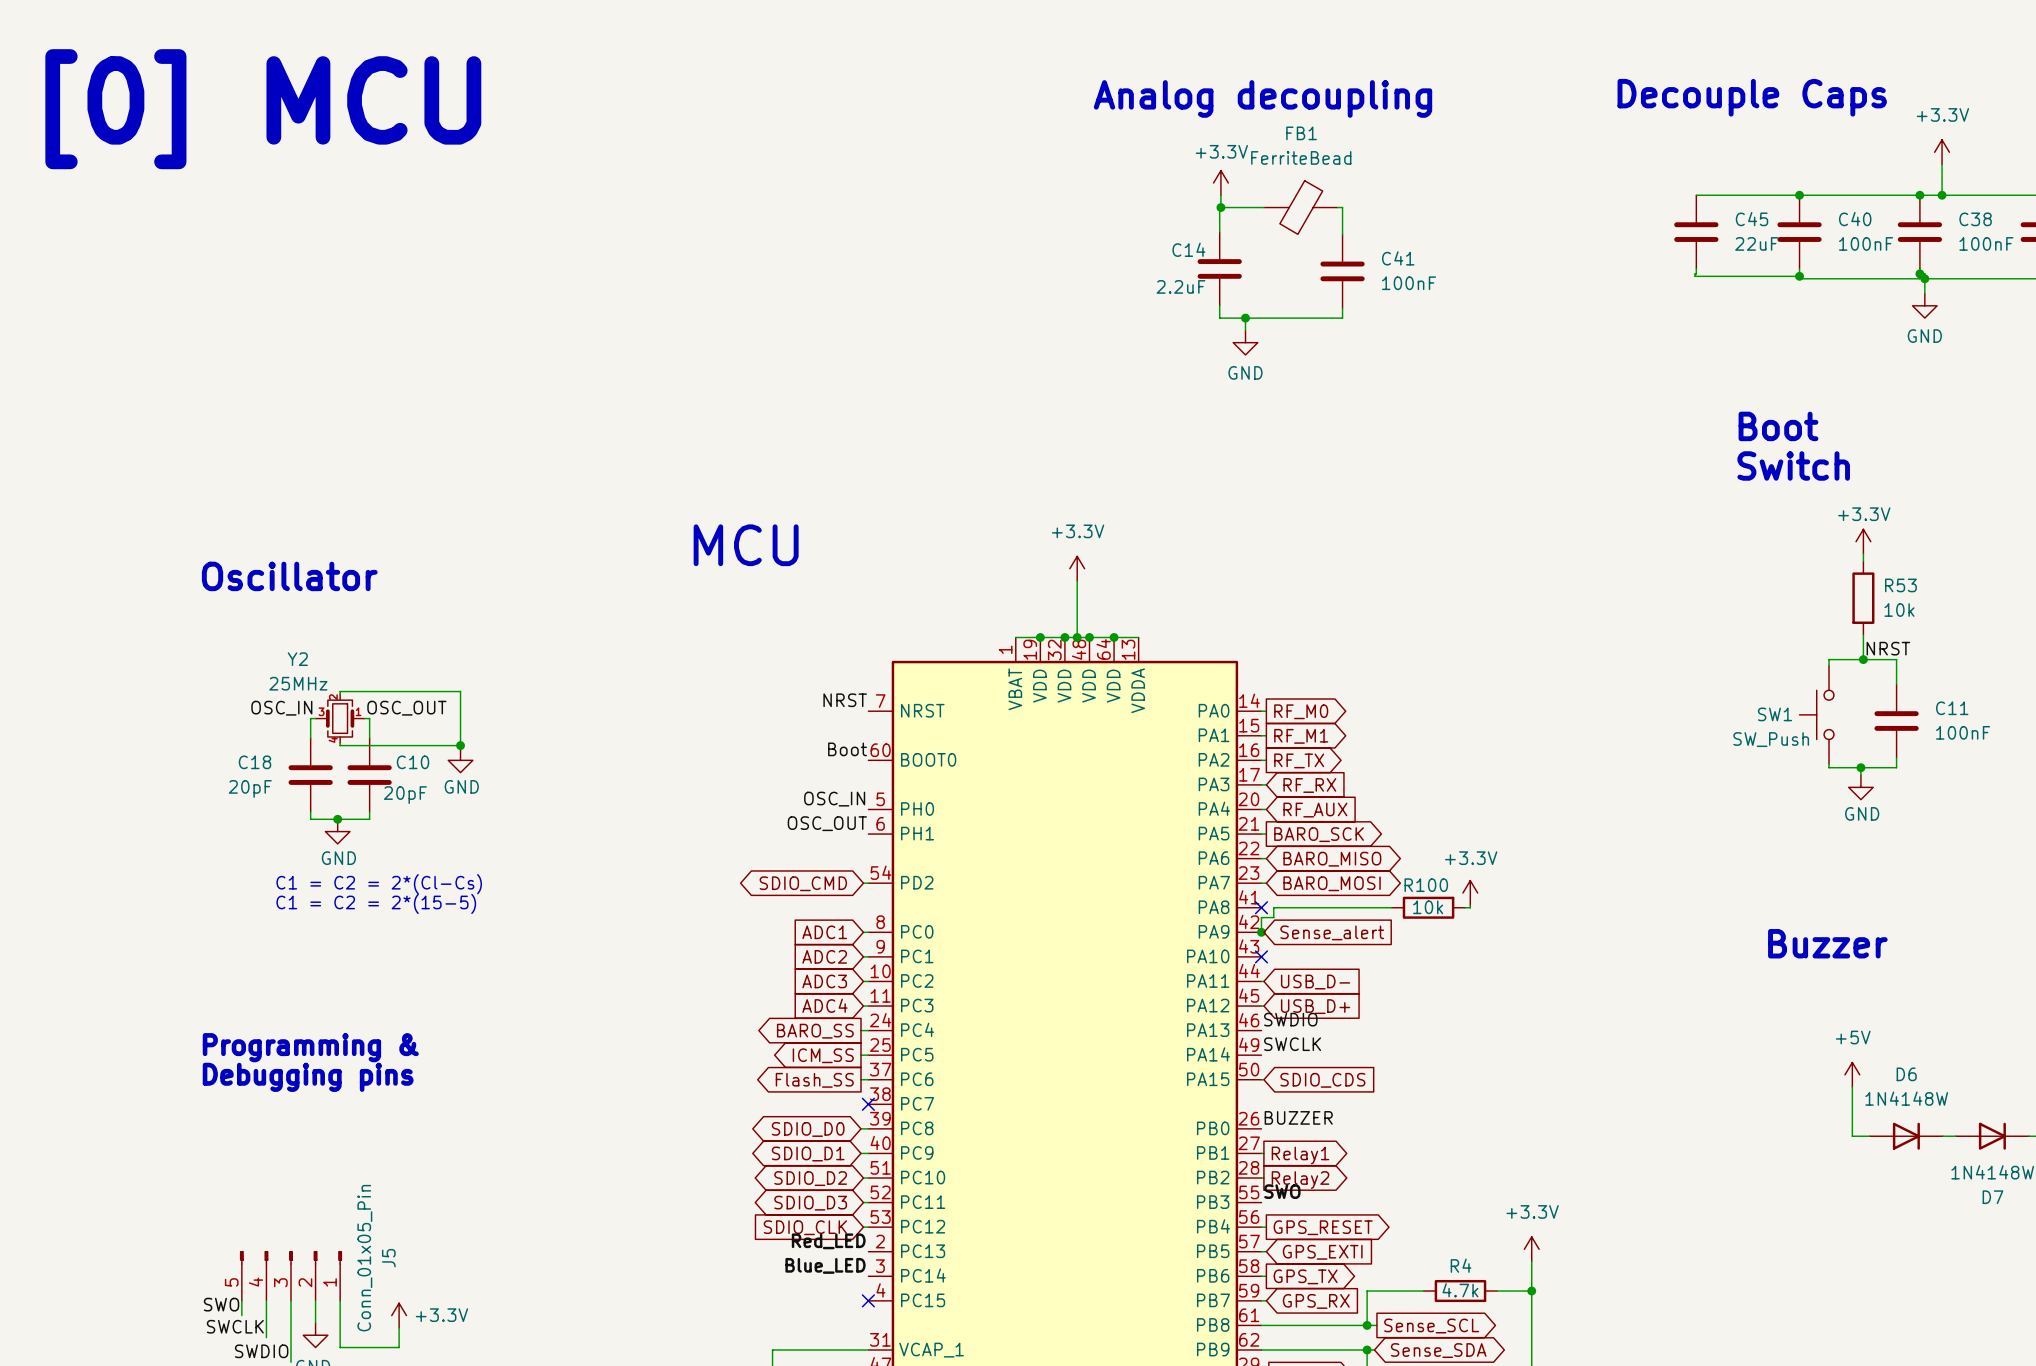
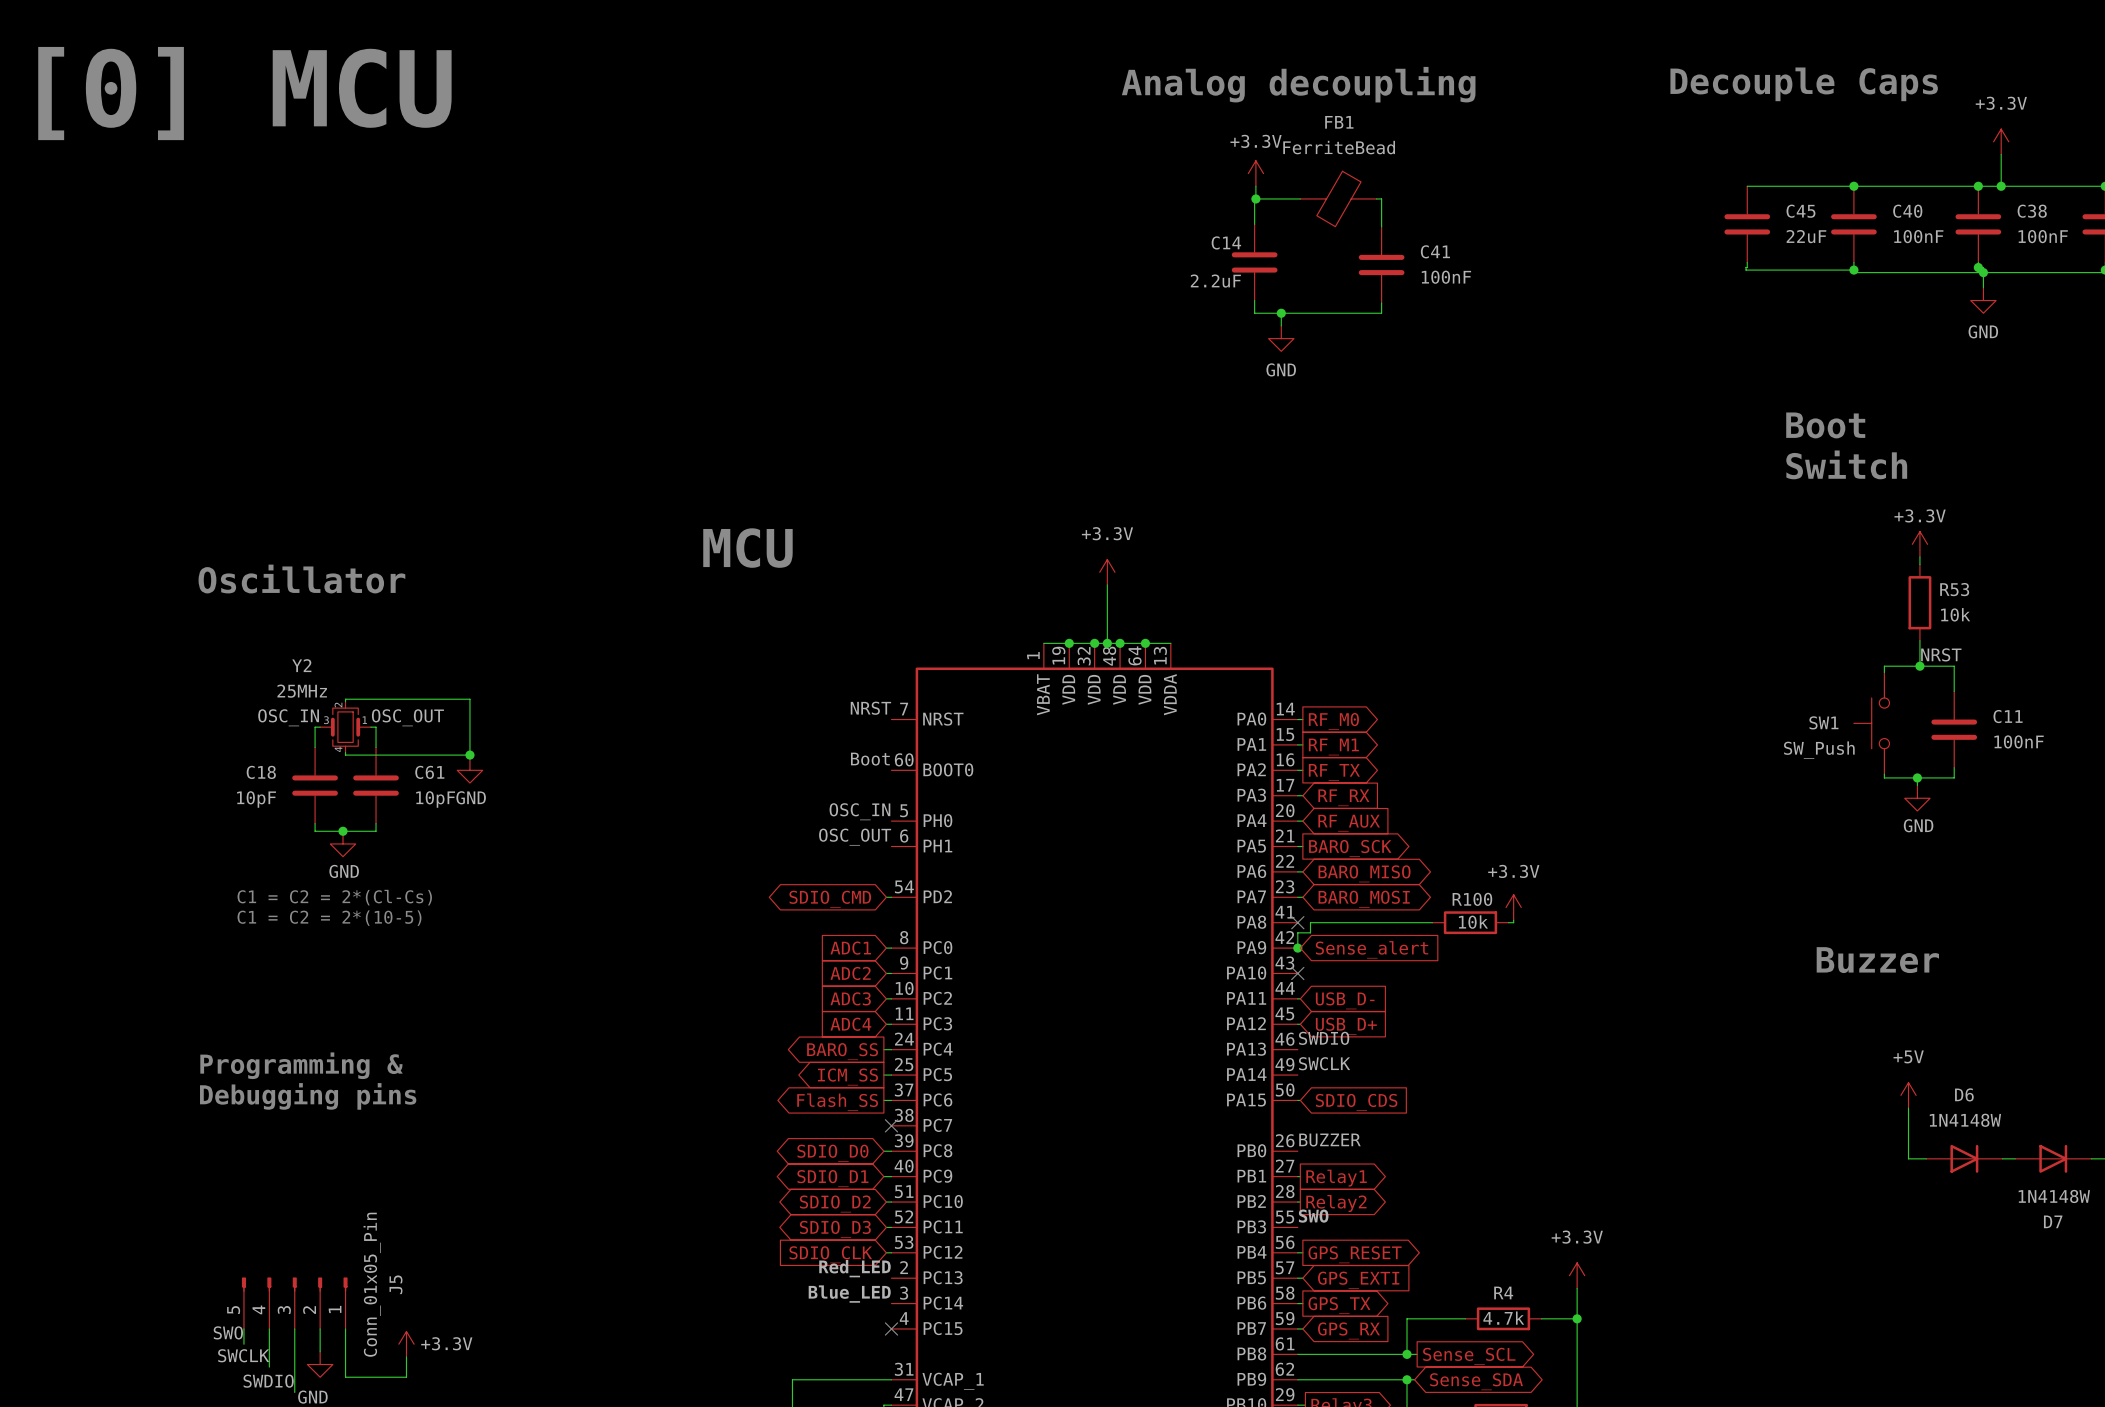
C10 name: C10 (413, 762) -> C61 (429, 772)
C18 value: 20pF (250, 788) -> 10pF (256, 799)
C10 value: 20pF (405, 795) -> 10pF (435, 799)
text position: C1 = C2 = 2*(Cl-Cs) (379, 884) -> C1 = C2 = 2*(Cl-Cs) (334, 897)
text: C1 = C2 = 2*(15-5) (376, 903) -> C1 = C2 = 2*(10-5) (329, 918)

